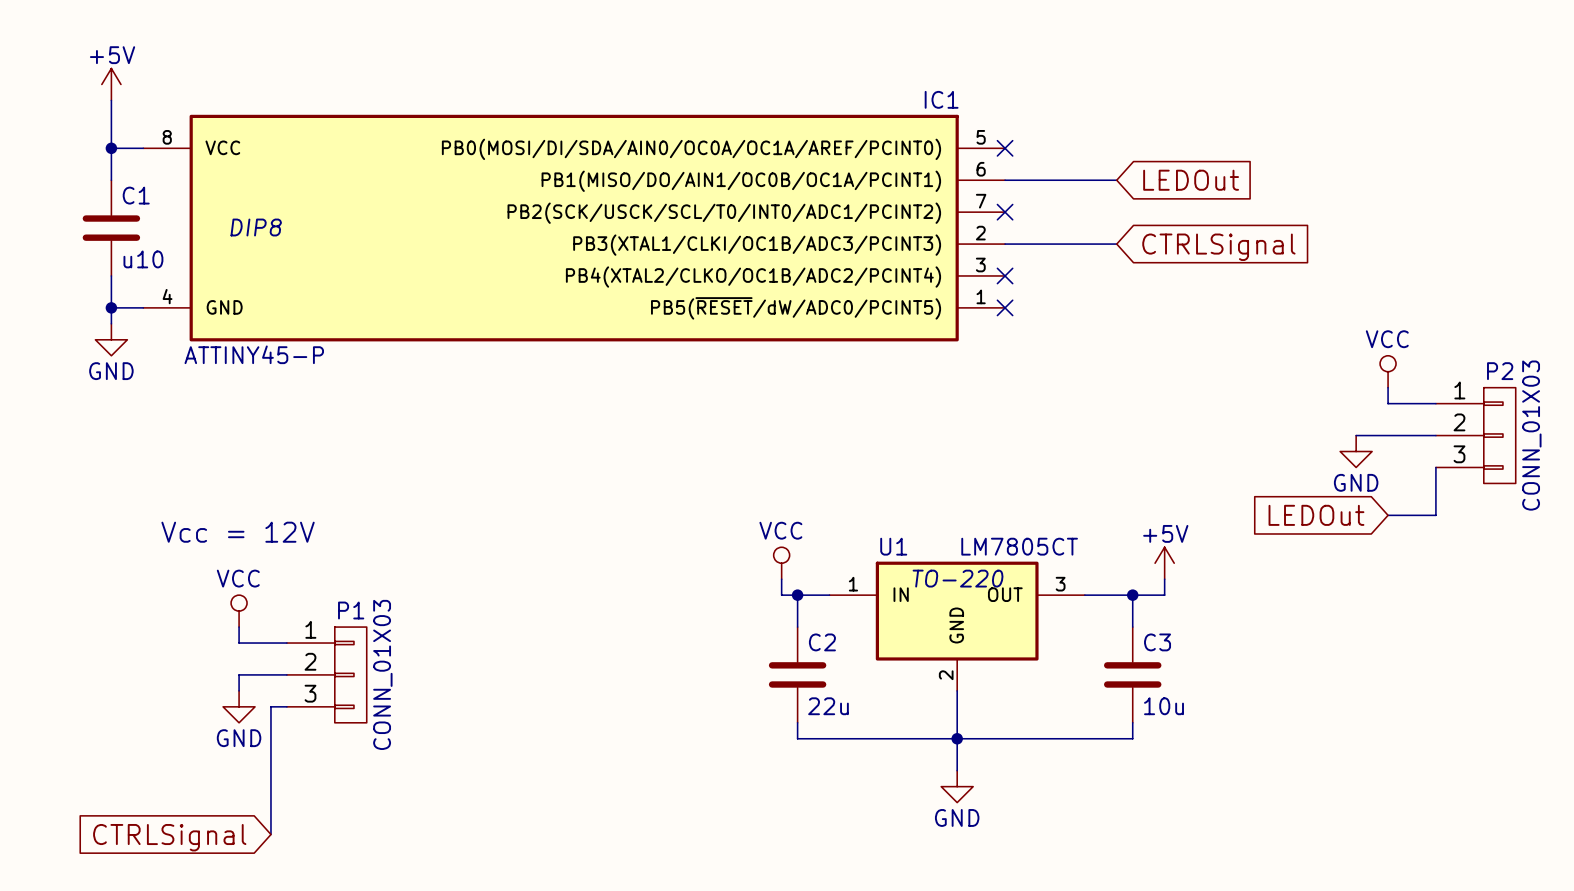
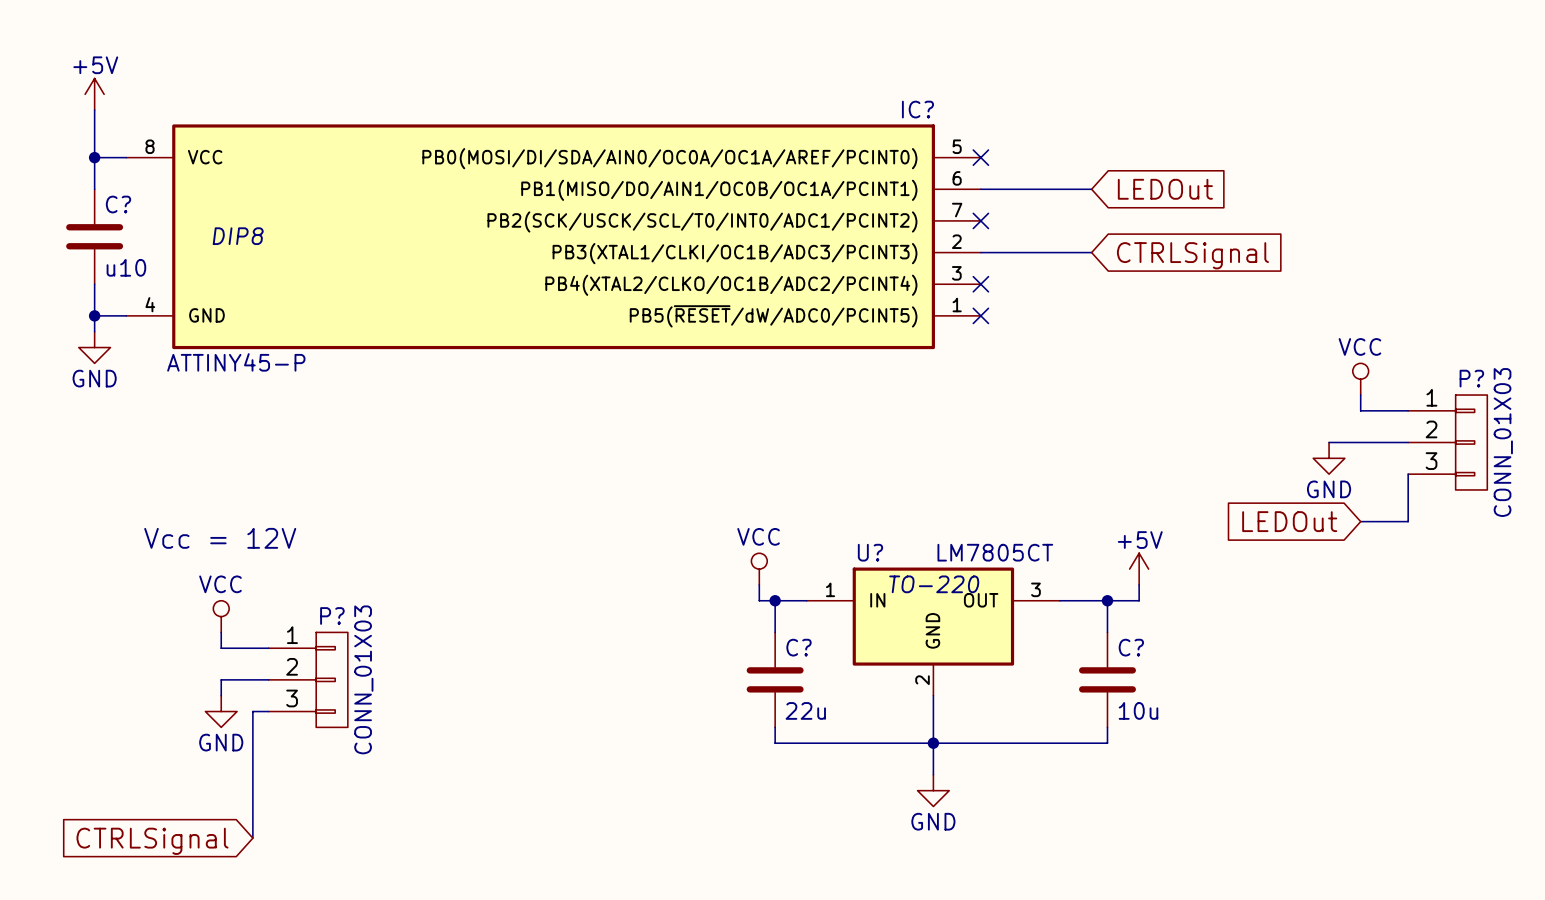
IC1 name: IC1 (941, 99) -> IC? (917, 109)
C1 name: C1 (136, 195) -> C? (118, 204)
P2 name: P2 (1500, 371) -> P? (1471, 378)
U1 name: U1 (893, 546) -> U? (870, 552)
P1 name: P1 (351, 610) -> P? (332, 615)
C2 name: C2 (822, 642) -> C? (799, 647)
C3 name: C3 (1157, 642) -> C? (1131, 647)

